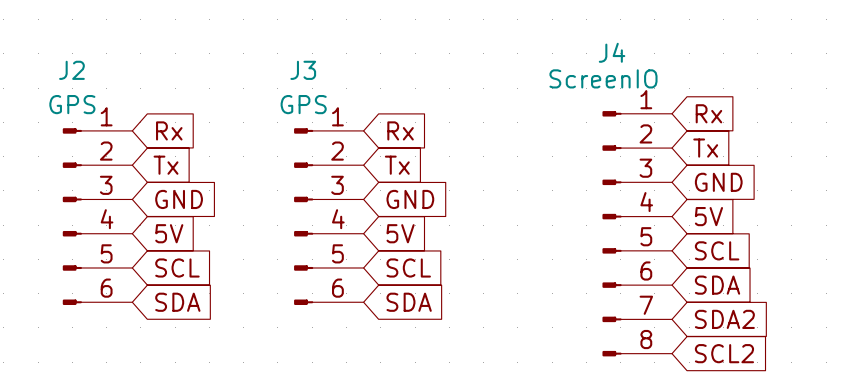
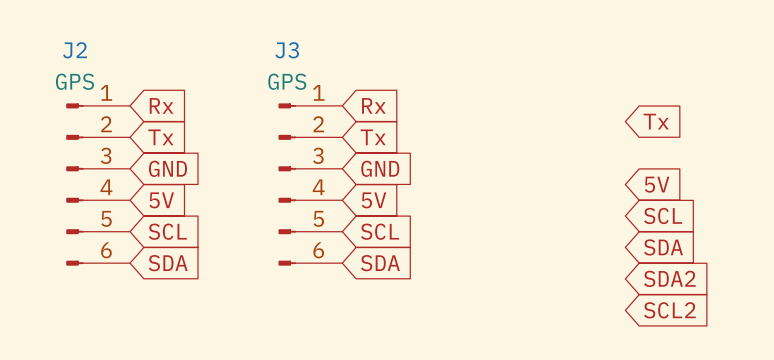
global label: Rx (708, 113) -> none
global label: GND (718, 182) -> none
J4: ScreenIO (637, 233) -> none

